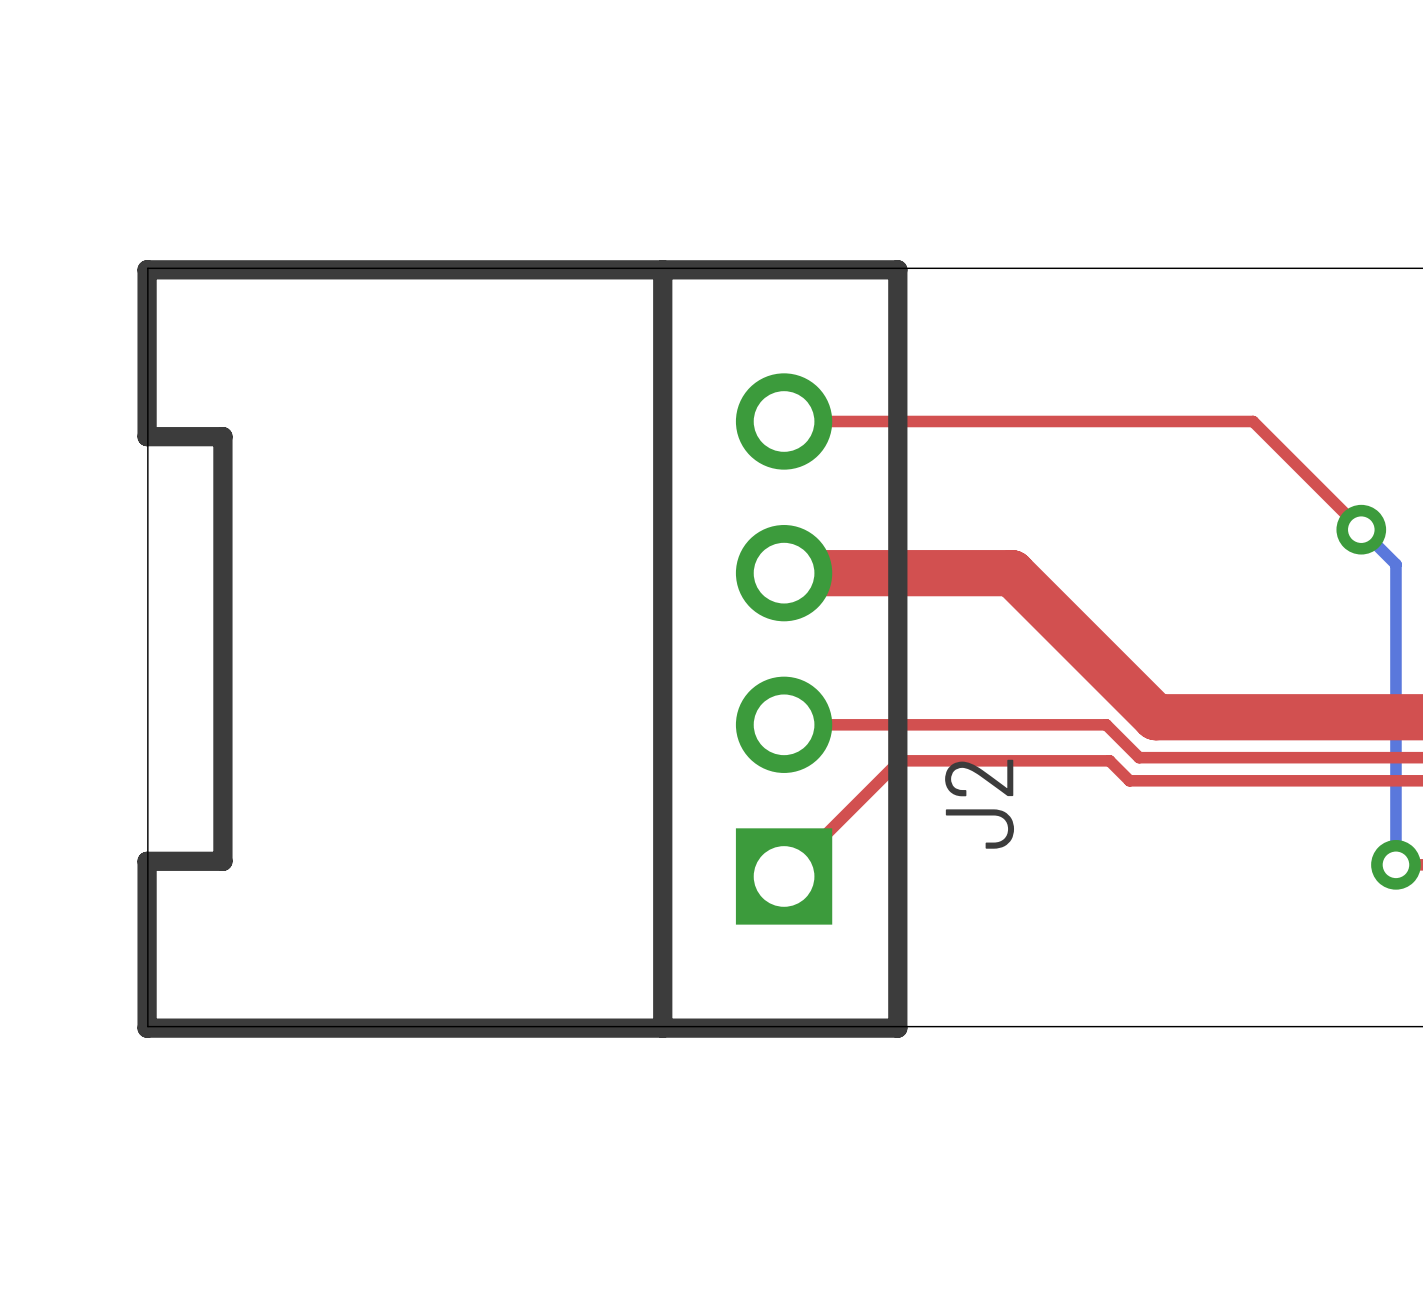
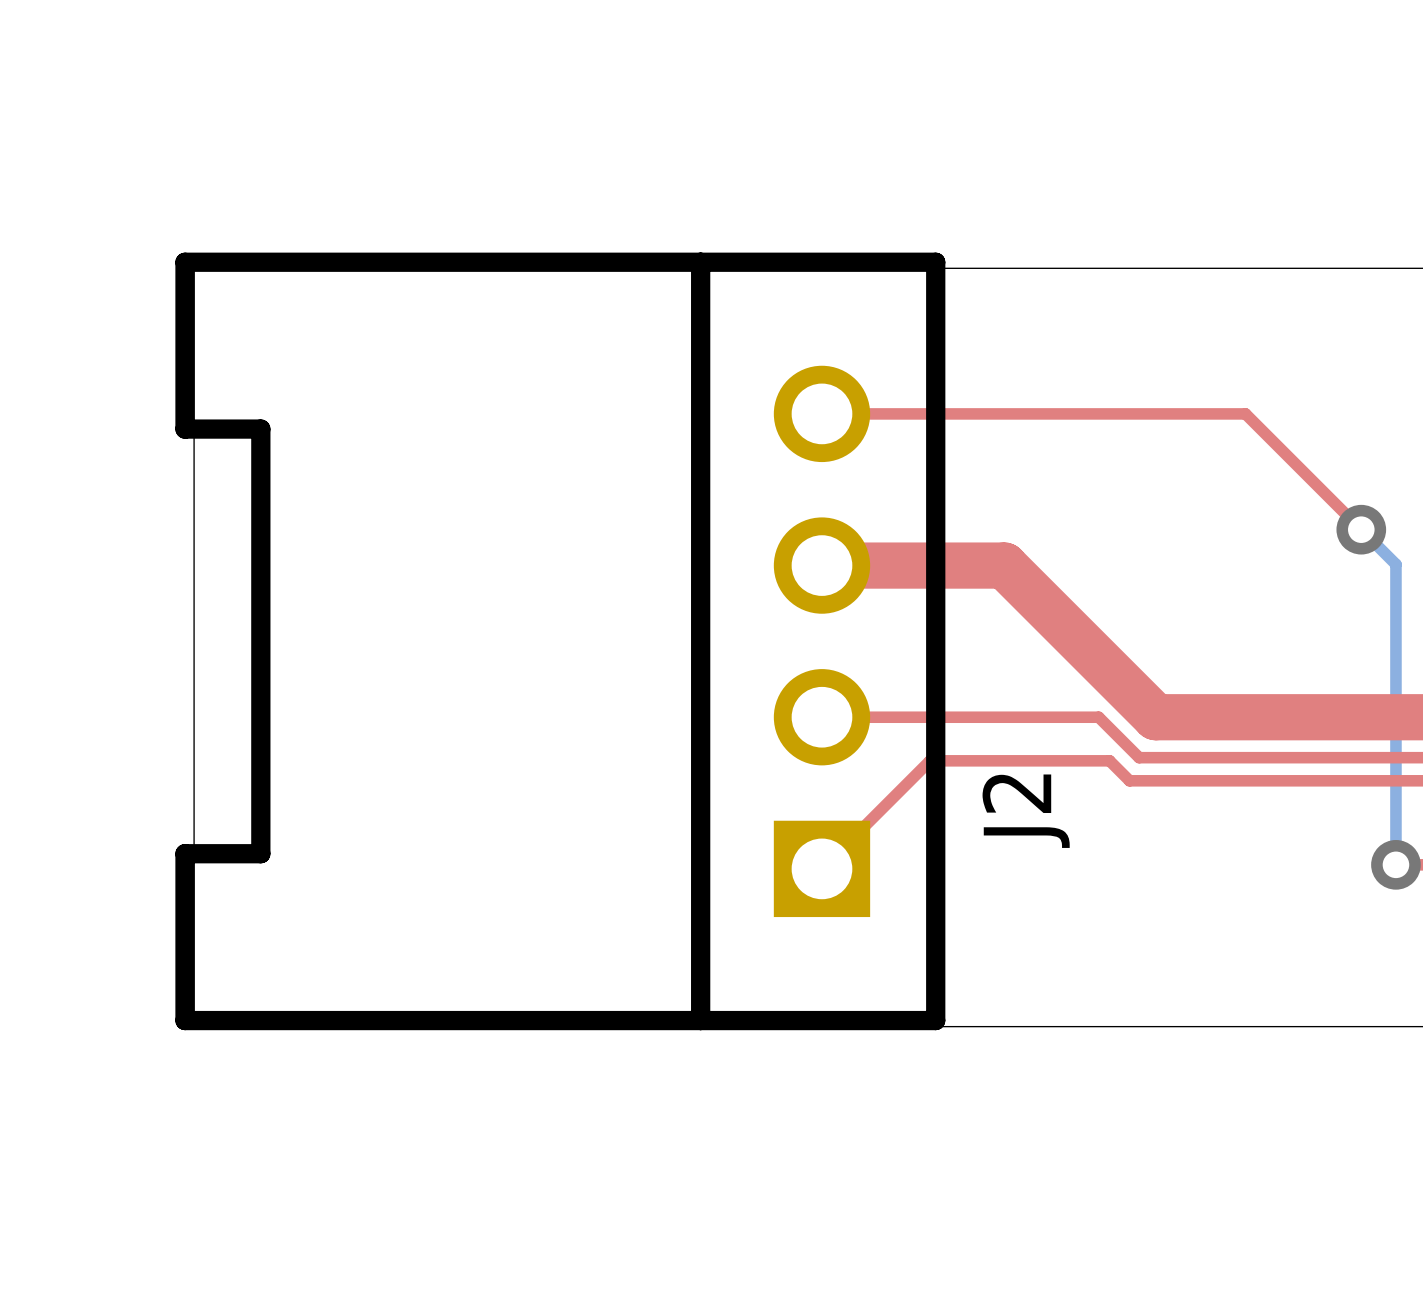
board edge: (194, 268) (147, 268) (147, 1026) (194, 1026) -> (194, 268) (194, 1026)
top track: (784, 421) (1253, 421) -> (821, 413) (1245, 413) (1253, 421)
top track: (784, 573) (1011, 573) -> (821, 565) (1004, 565) (1011, 573)
J2 position: (522, 648) -> (560, 641)
top track: (784, 724) (1106, 724) -> (821, 717) (1098, 717) (1106, 724)
top track: (930, 760) (899, 760) (784, 876) -> (930, 760) (821, 868)

